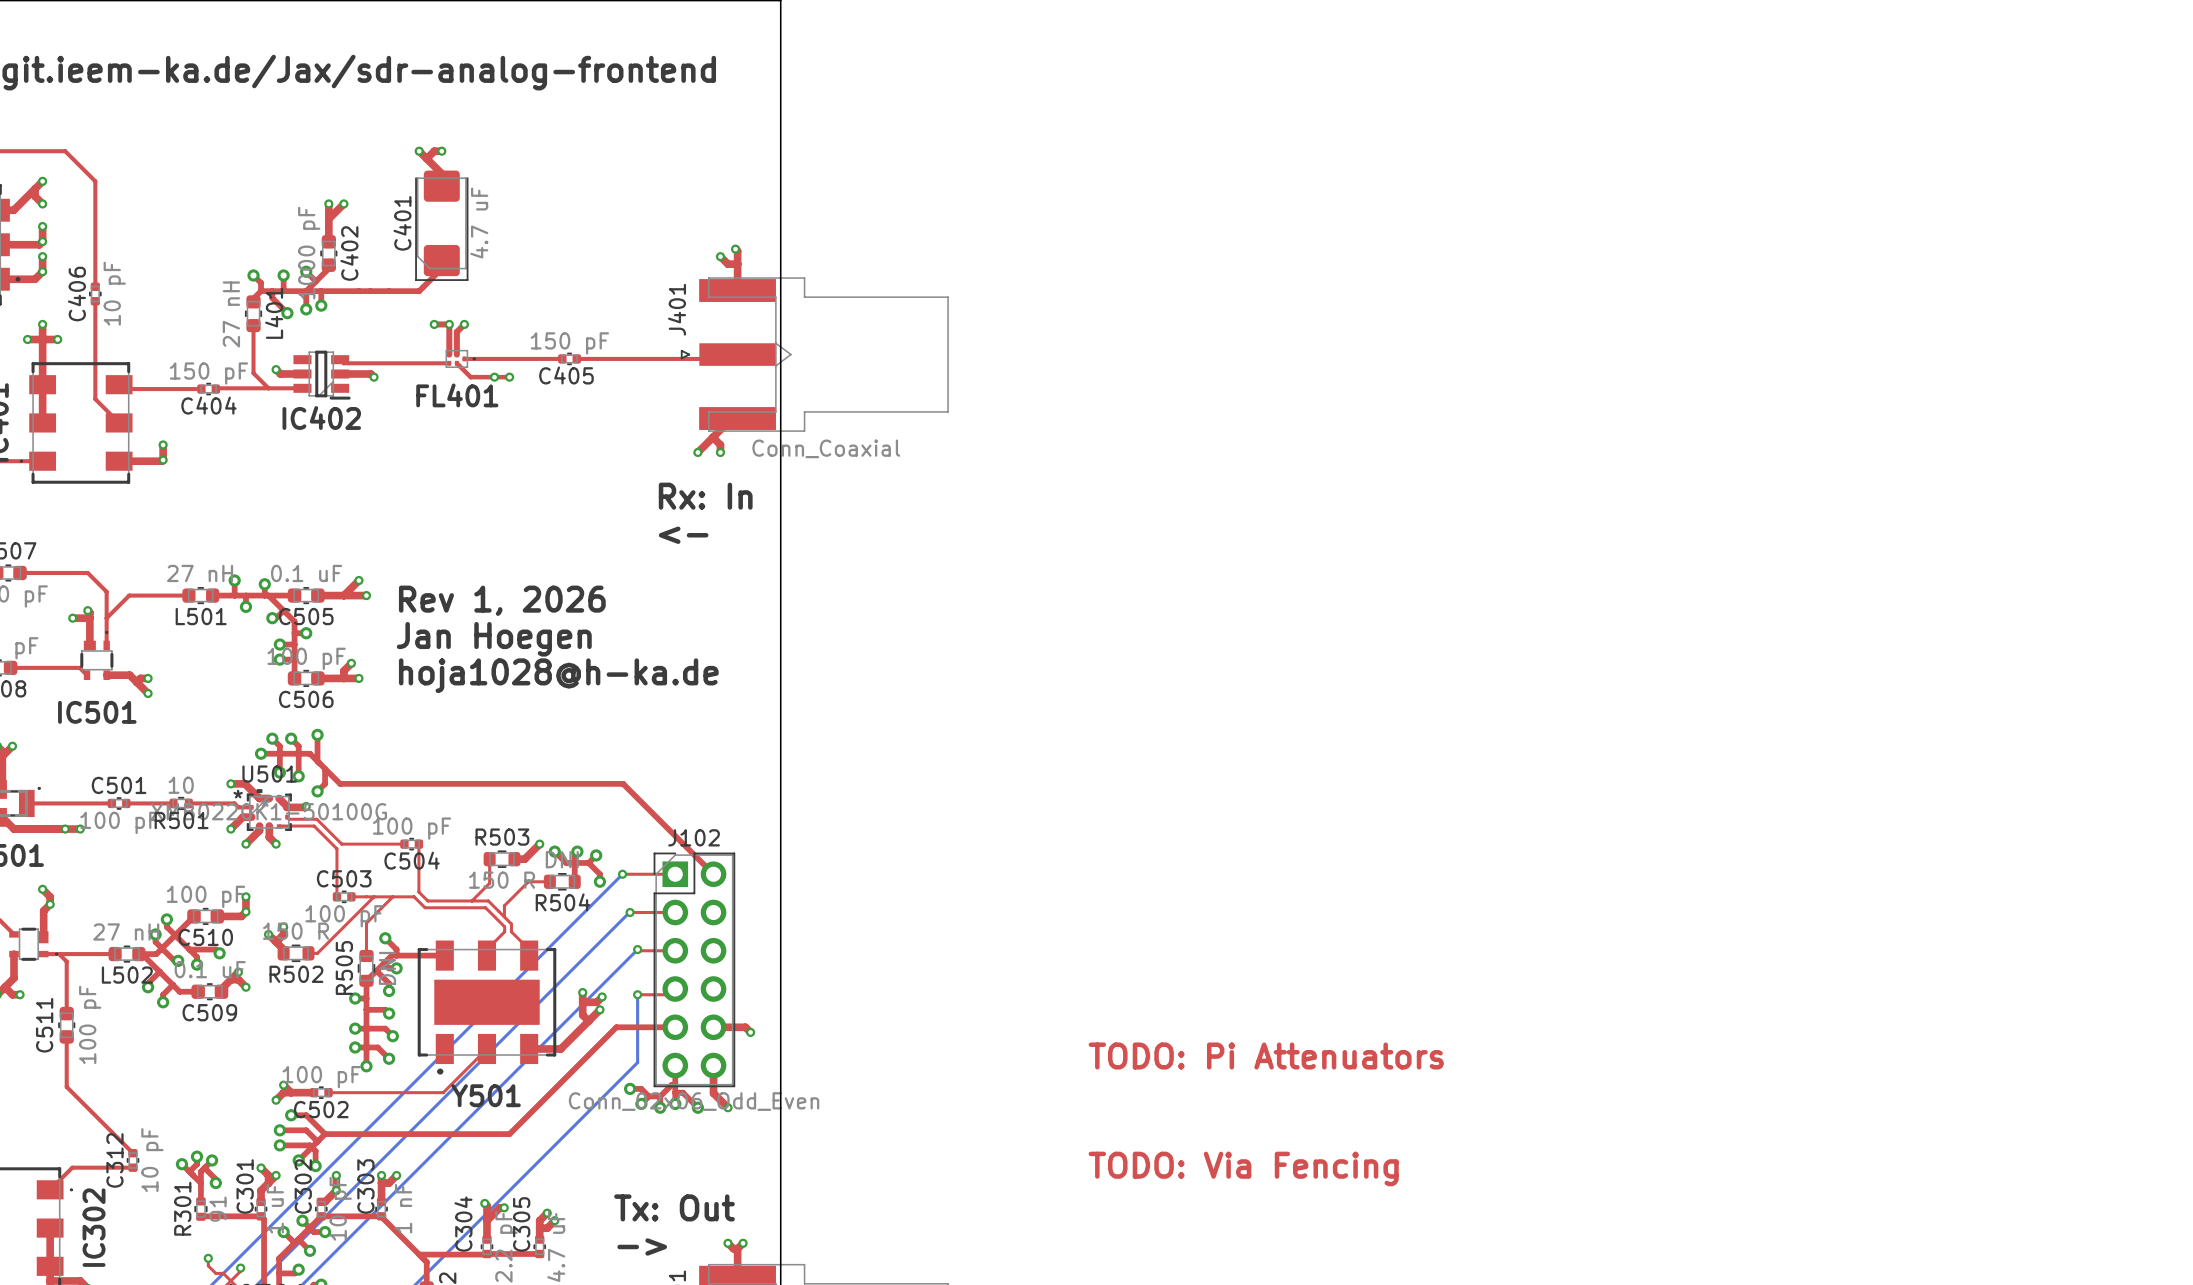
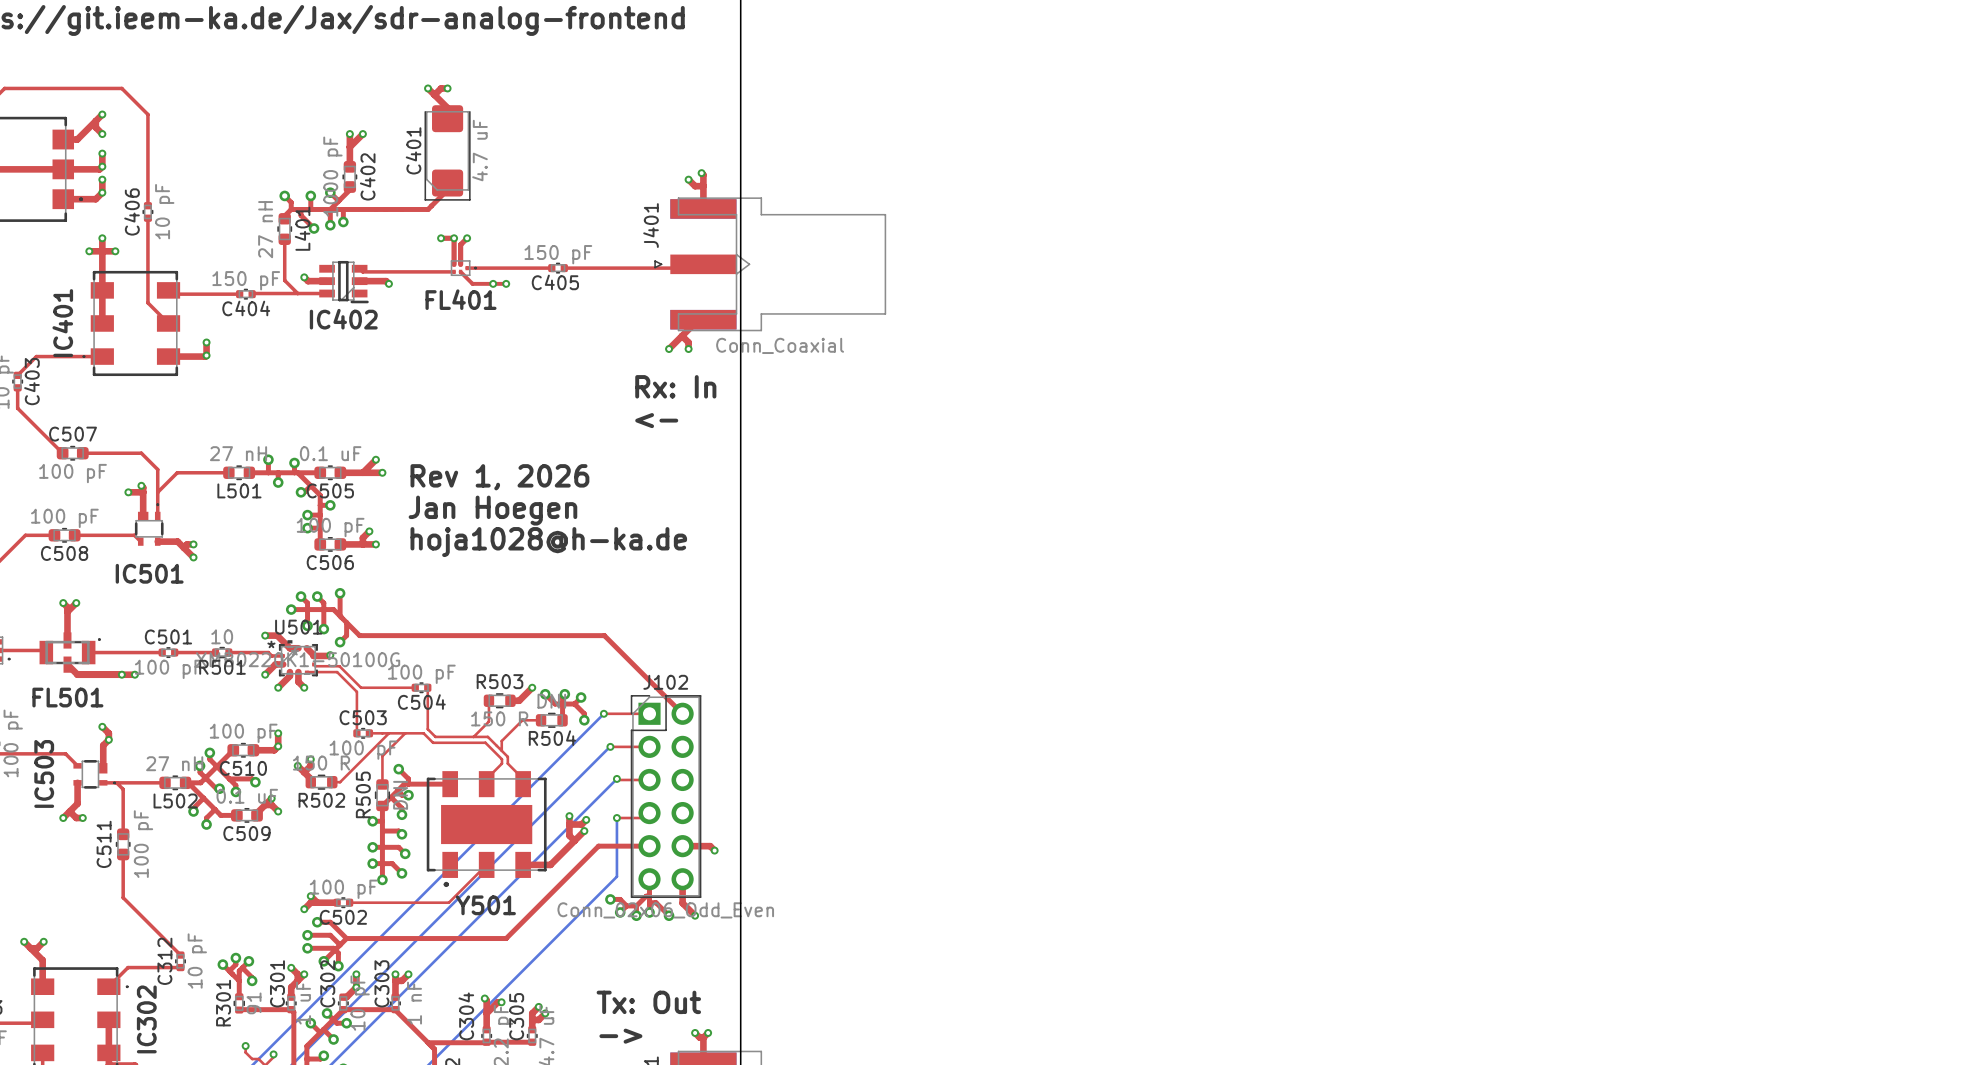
text: TODO: Pi Attenuators (1266, 1056) -> none
text: TODO: Via Fencing (1243, 1168) -> none

